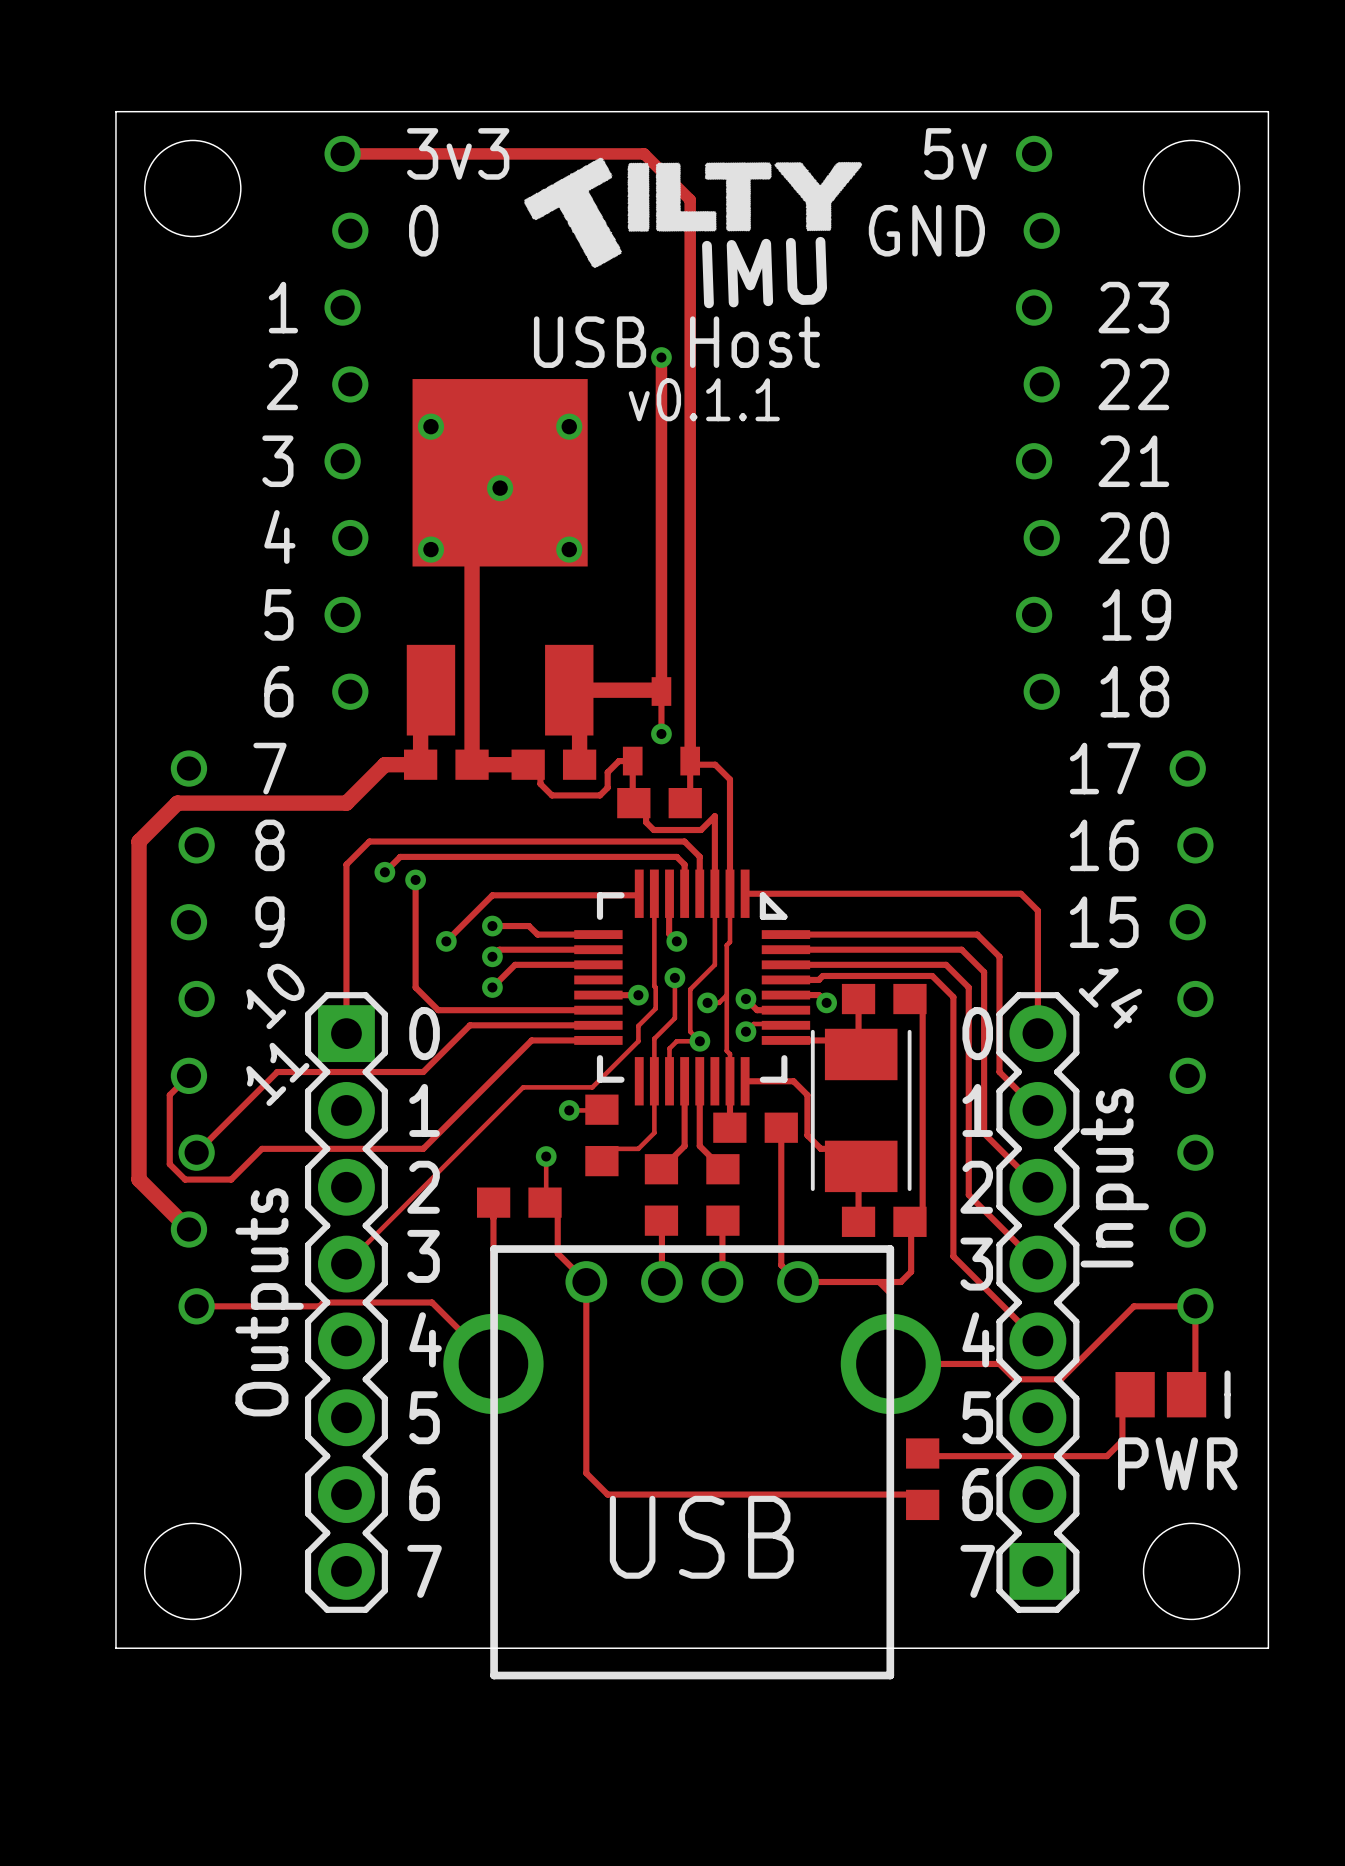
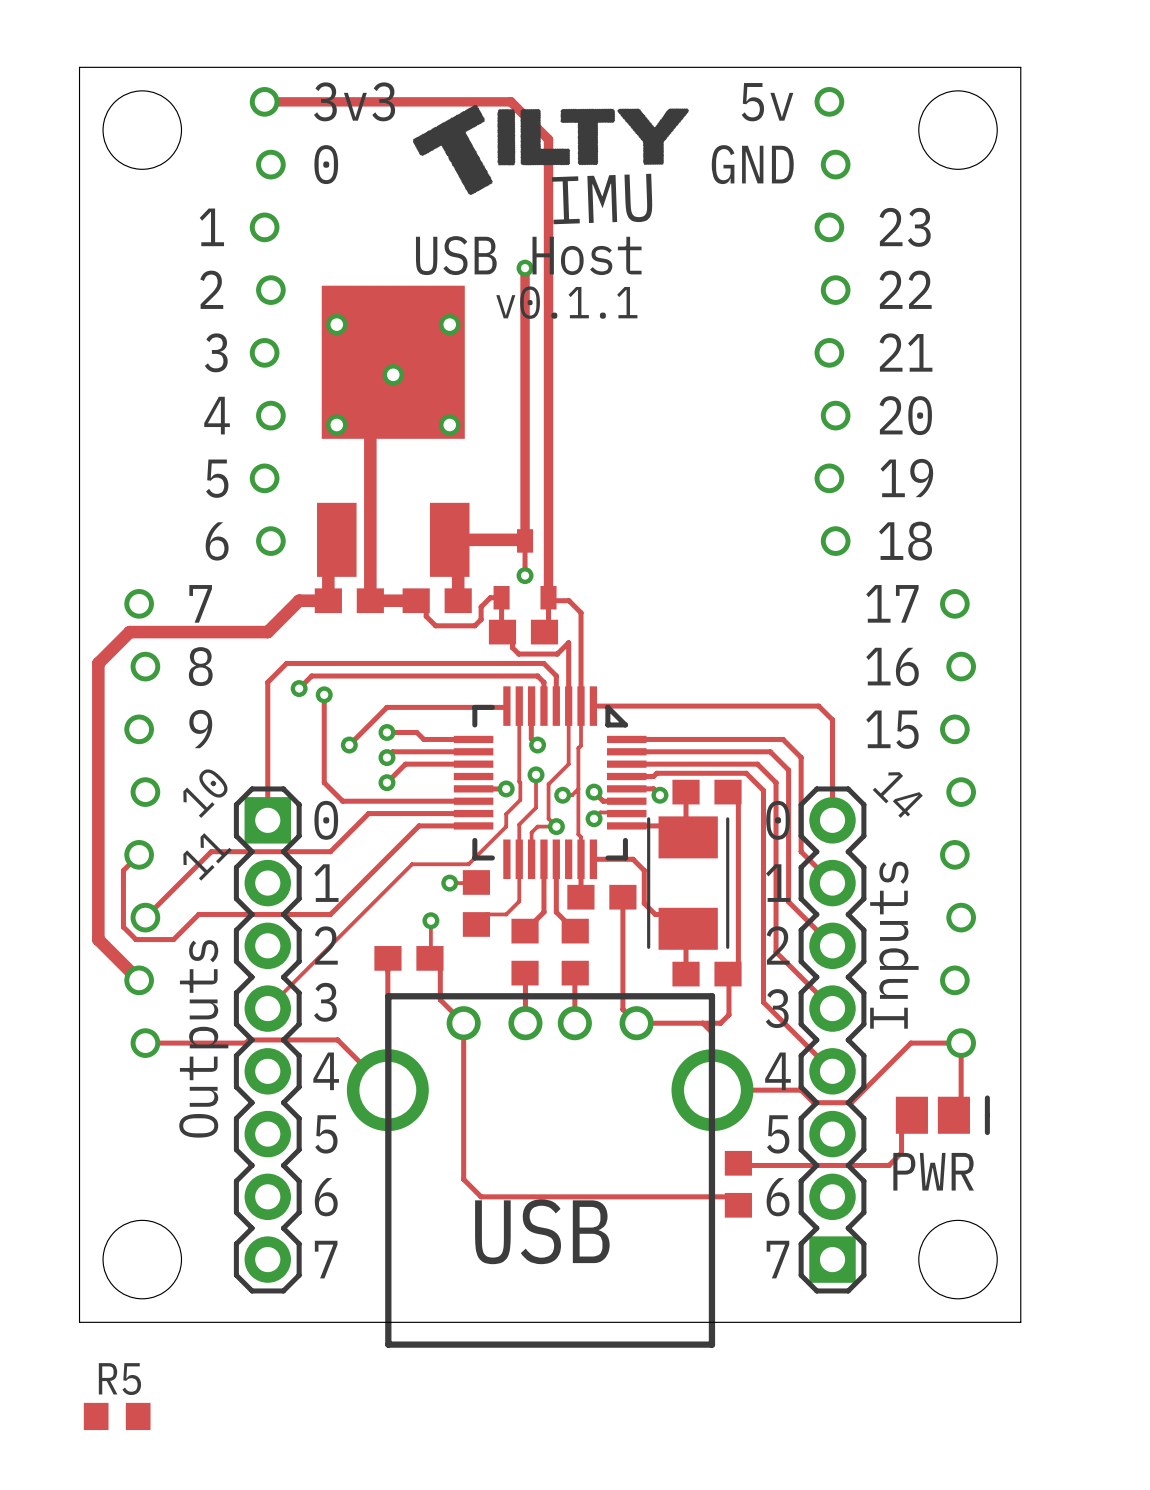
R5: none -> (117, 1416)

